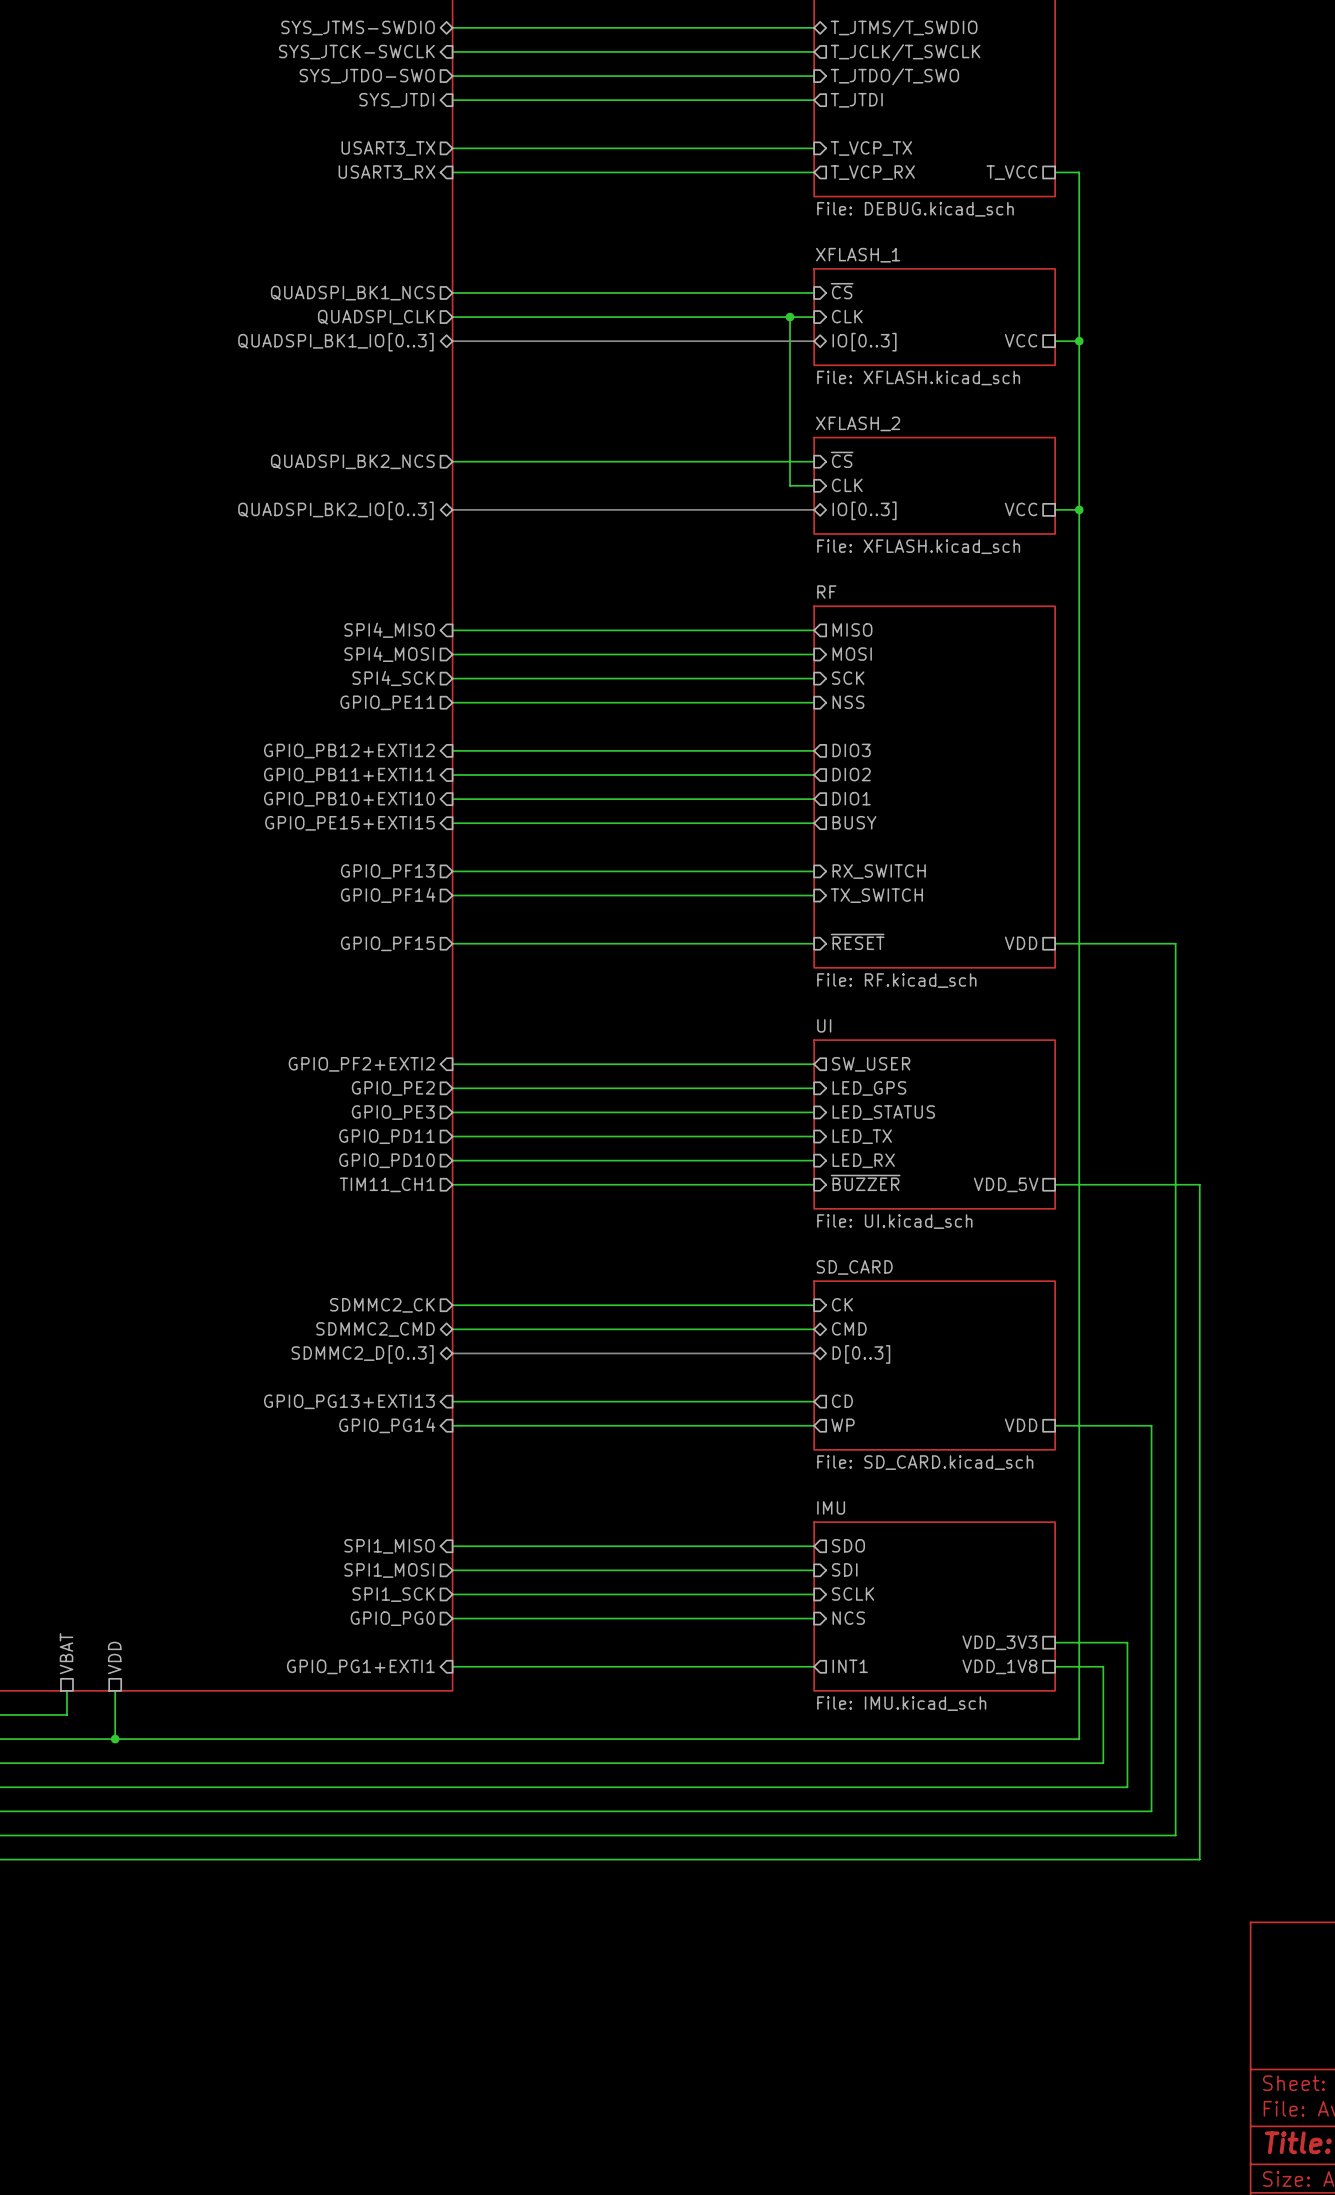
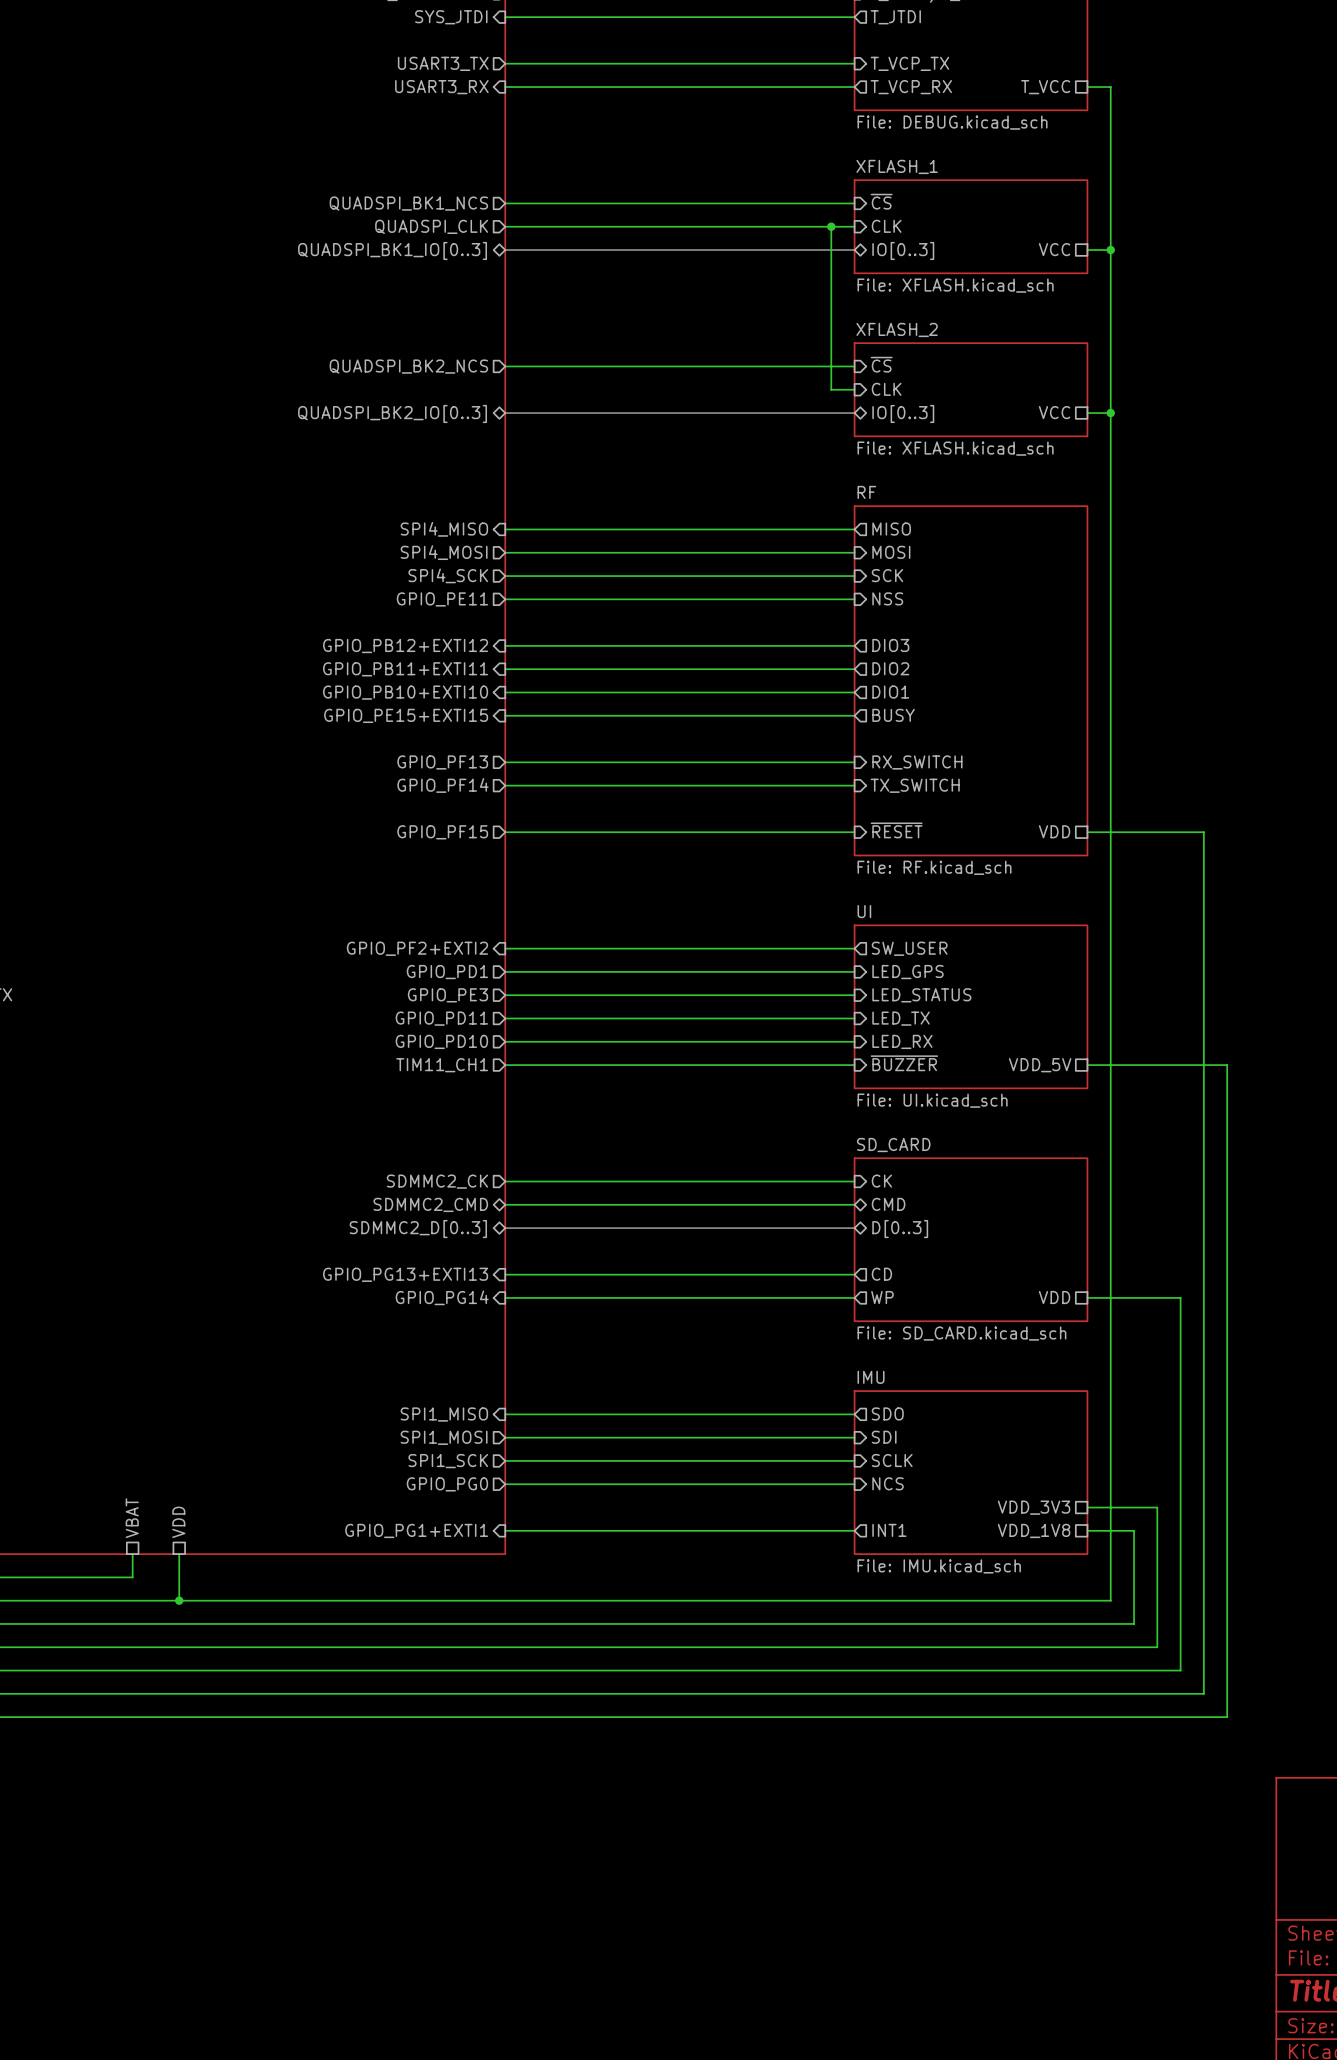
sheet pin: GPIO_PE2 (393, 1088) -> GPIO_PD1 (447, 972)

